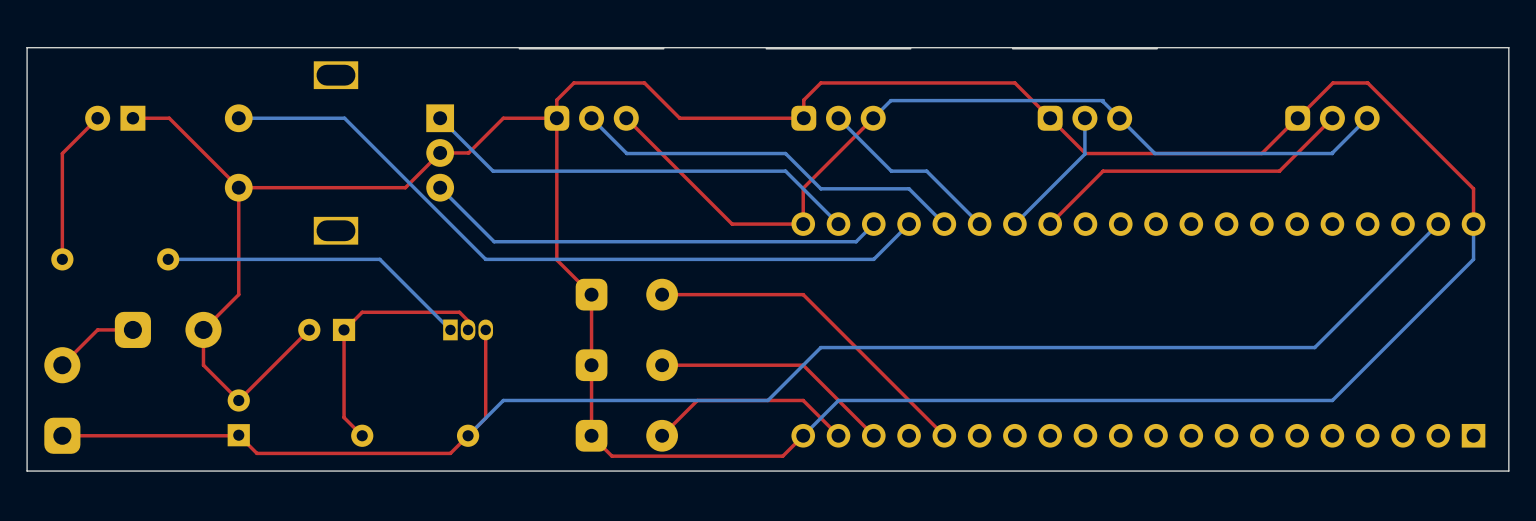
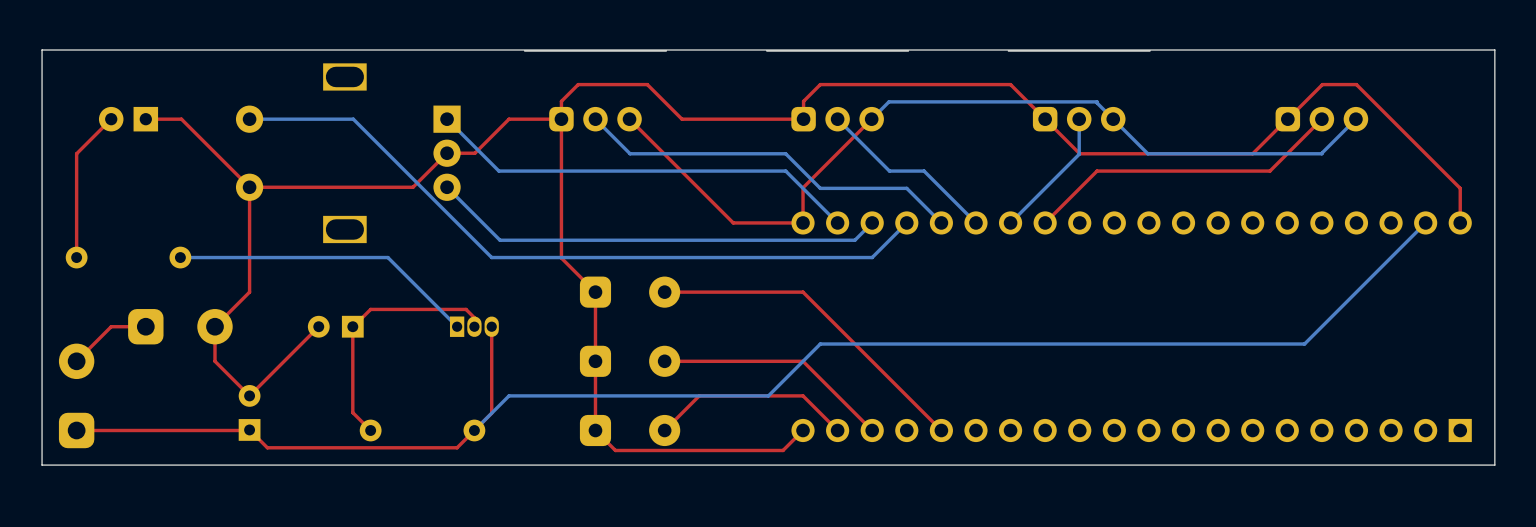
bottom track: (1473, 224) (1473, 259) (1332, 400) (838, 400) (803, 435) -> none

